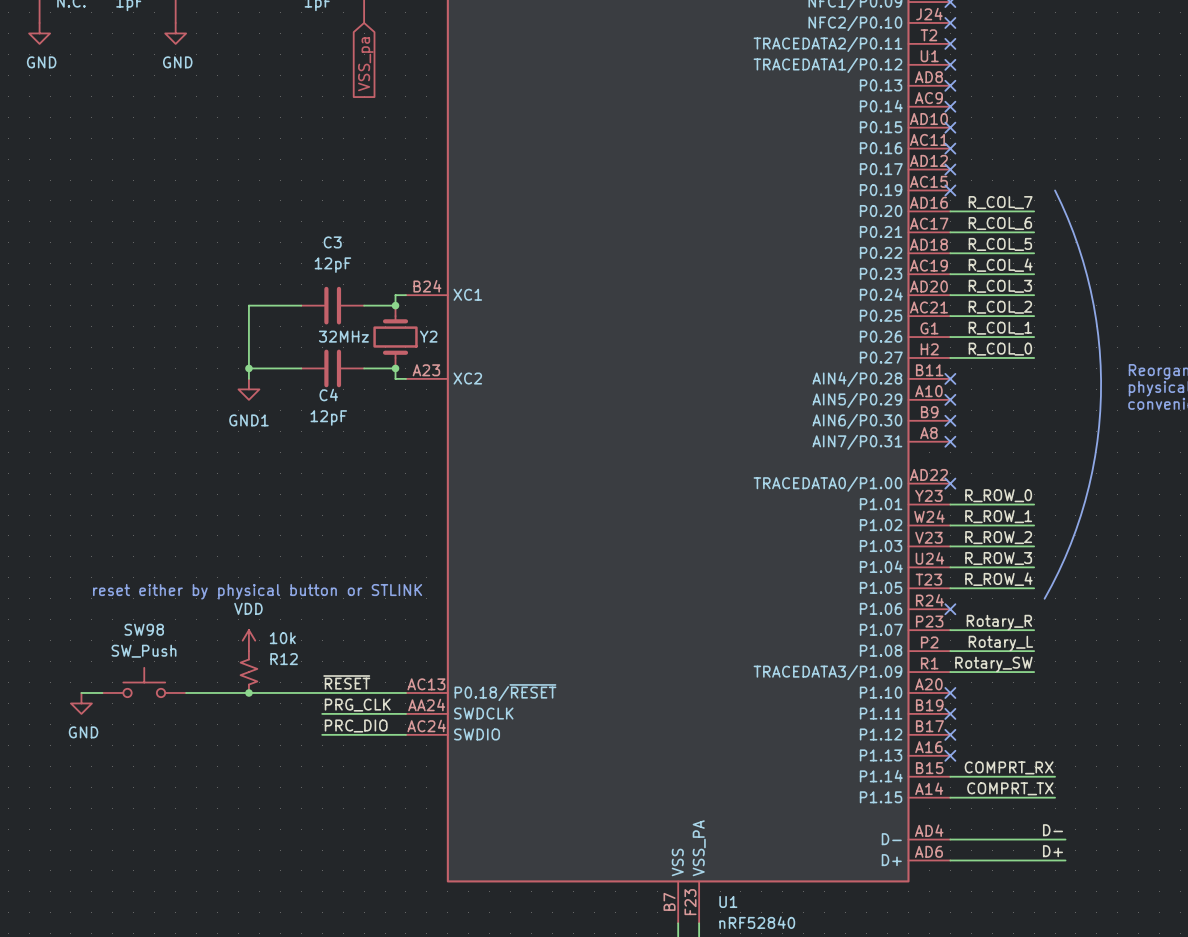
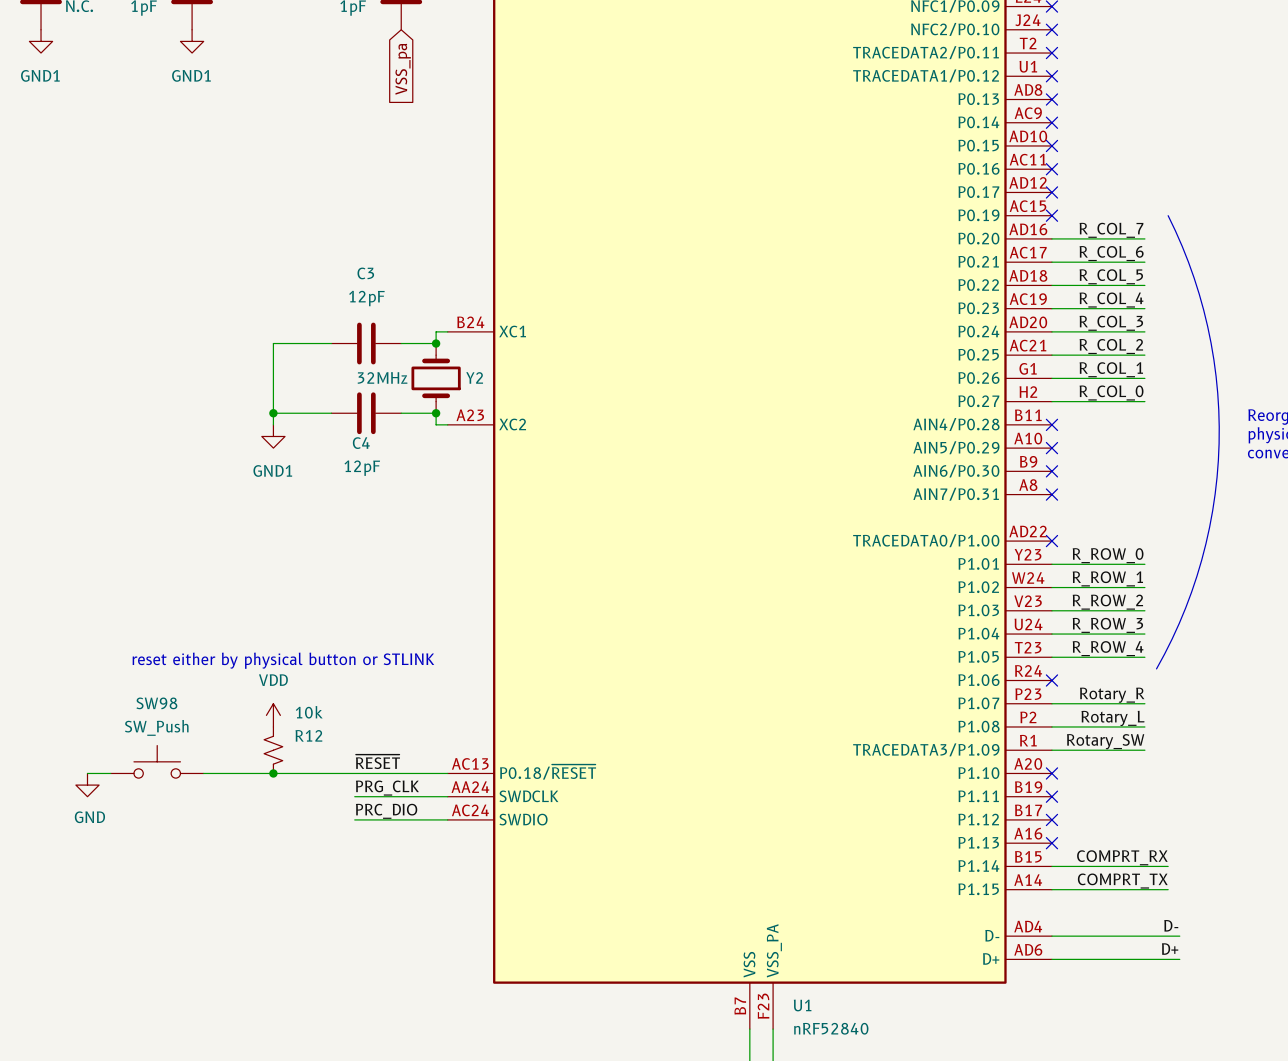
power symbol: GND (39, 33) -> GND1 (41, 41)
power symbol: GND (175, 33) -> GND1 (192, 41)

